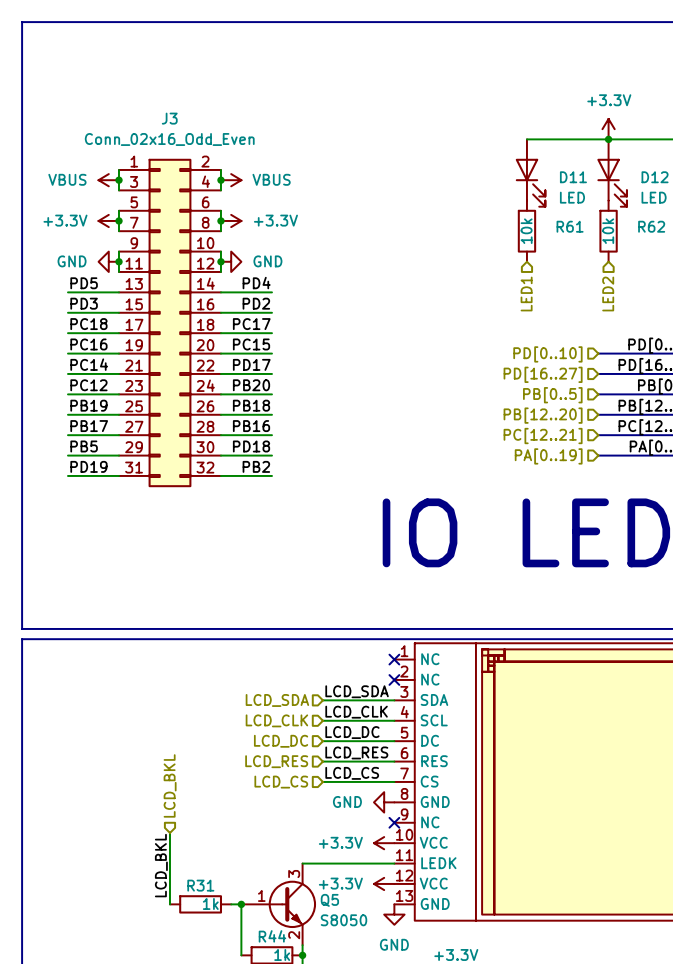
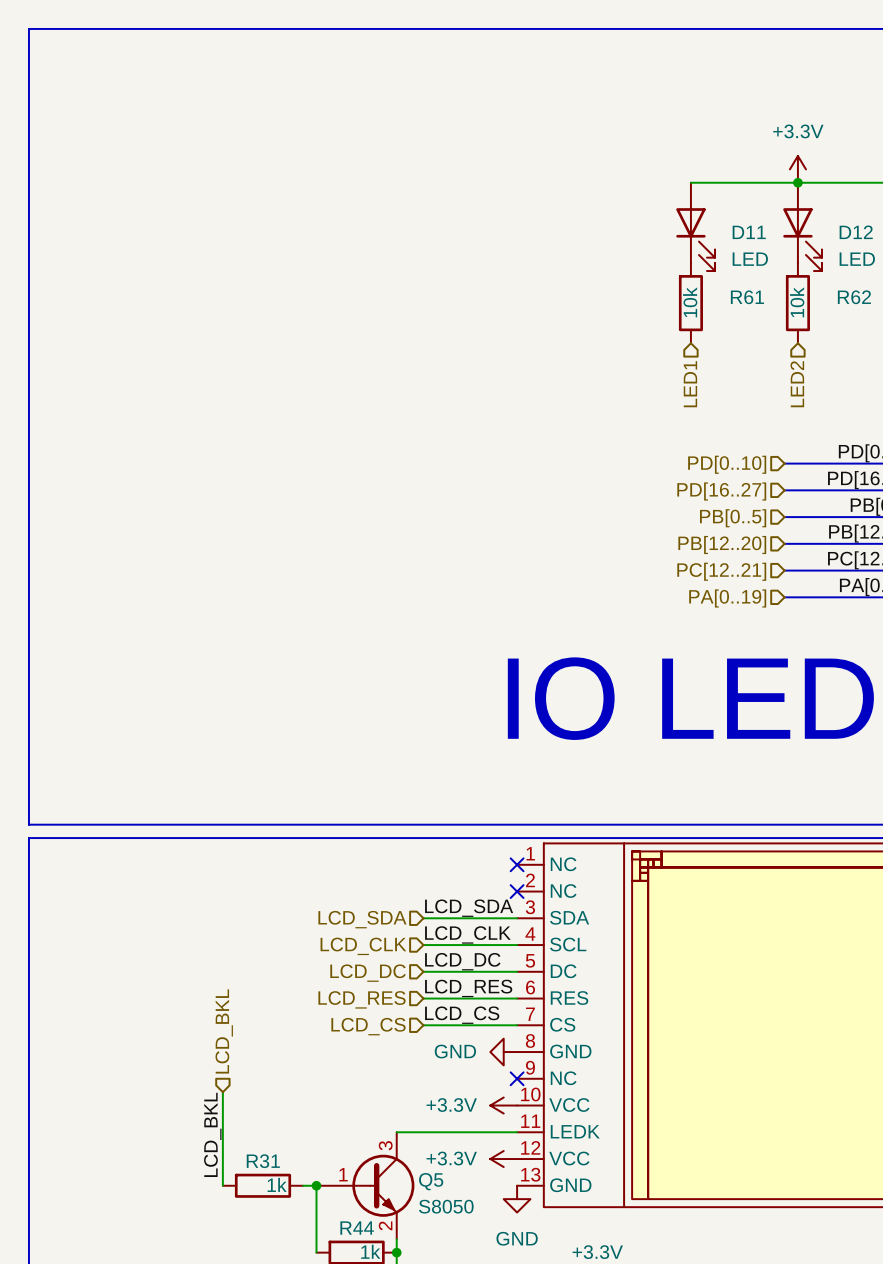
wire: (118, 169) (118, 190) -> none
wire: (220, 169) (220, 190) -> none
power symbol: VBUS (108, 180) -> none
junction: (118, 180) -> none
junction: (220, 180) -> none
power symbol: VBUS (231, 180) -> none
wire: (118, 210) (118, 231) -> none
wire: (220, 210) (220, 231) -> none
power symbol: +3.3V (108, 220) -> none
junction: (118, 220) -> none
junction: (220, 220) -> none
power symbol: +3.3V (231, 220) -> none
wire: (118, 251) (118, 271) -> none
wire: (220, 251) (220, 271) -> none
power symbol: GND (108, 261) -> none
junction: (118, 261) -> none
junction: (220, 261) -> none
power symbol: GND (231, 261) -> none
label: PD5 (84, 283) -> none
label: PD4 (256, 283) -> none
wire: (67, 292) (118, 292) -> none
wire: (220, 292) (271, 292) -> none
label: PD3 (84, 303) -> none
label: PD2 (256, 303) -> none
wire: (67, 312) (118, 312) -> none
wire: (220, 312) (271, 312) -> none
J3: Conn_02x16_Odd_Even (169, 322) -> none
label: PC18 (88, 324) -> none
label: PC17 (251, 324) -> none
wire: (67, 333) (118, 333) -> none
wire: (220, 333) (271, 333) -> none
label: PC16 (88, 344) -> none
label: PC15 (251, 344) -> none
wire: (67, 353) (118, 353) -> none
wire: (220, 353) (271, 353) -> none
label: PC14 (89, 364) -> none
label: PD17 (251, 364) -> none
wire: (67, 373) (118, 373) -> none
wire: (220, 373) (271, 373) -> none
label: PC12 (88, 385) -> none
label: PB20 (251, 385) -> none
wire: (67, 394) (118, 394) -> none
wire: (220, 394) (271, 394) -> none
label: PB19 (88, 405) -> none
label: PB18 (251, 405) -> none
wire: (67, 414) (118, 414) -> none
wire: (220, 414) (271, 414) -> none
label: PB17 (89, 426) -> none
label: PB16 (251, 426) -> none
wire: (67, 435) (118, 435) -> none
wire: (220, 435) (271, 435) -> none
label: PB5 (84, 446) -> none
label: PD18 (251, 446) -> none
wire: (67, 455) (118, 455) -> none
wire: (220, 455) (271, 455) -> none
label: PD19 (88, 466) -> none
label: PB2 (256, 466) -> none
wire: (67, 475) (118, 475) -> none
wire: (220, 475) (271, 475) -> none

